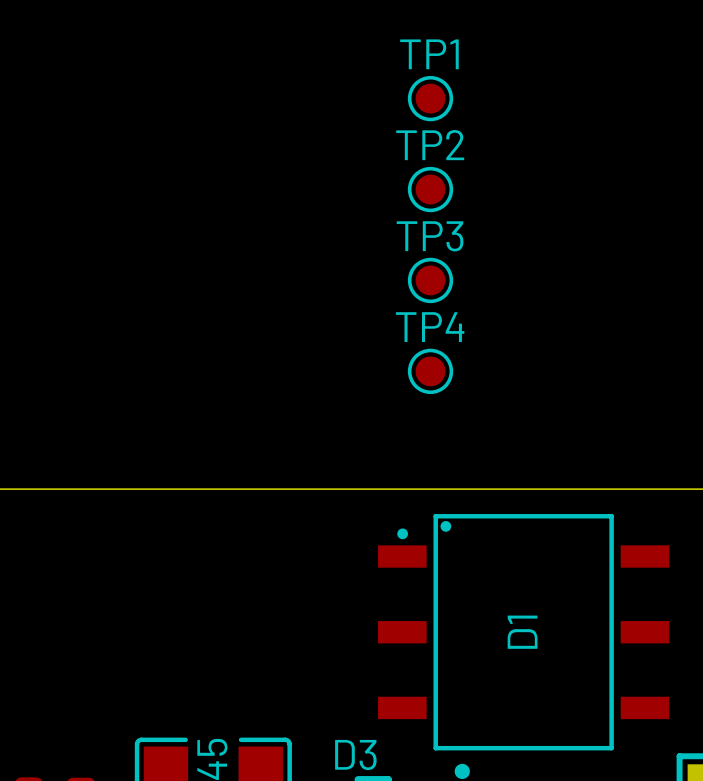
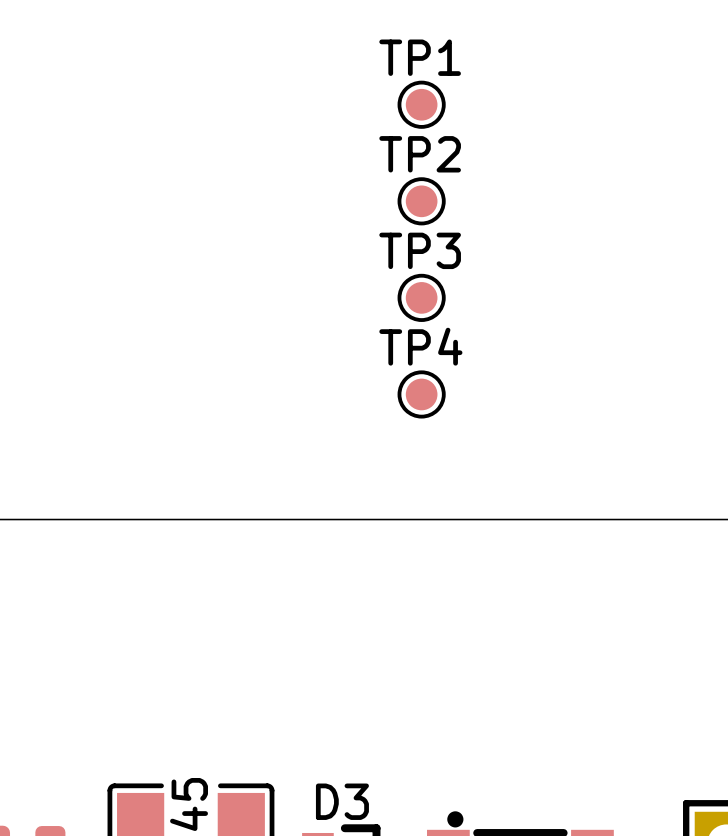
D1: (523, 632) -> none

